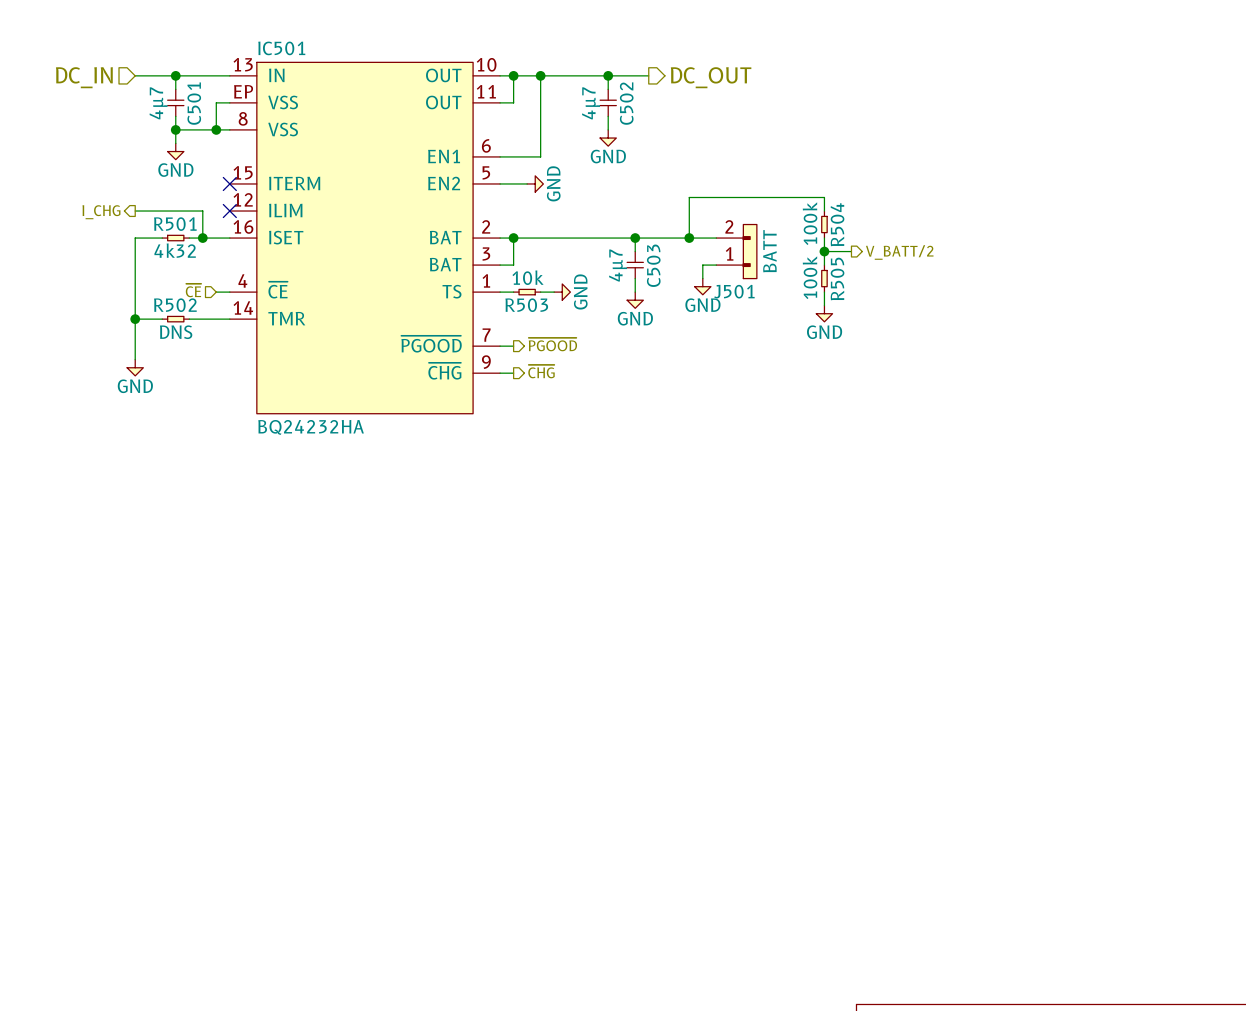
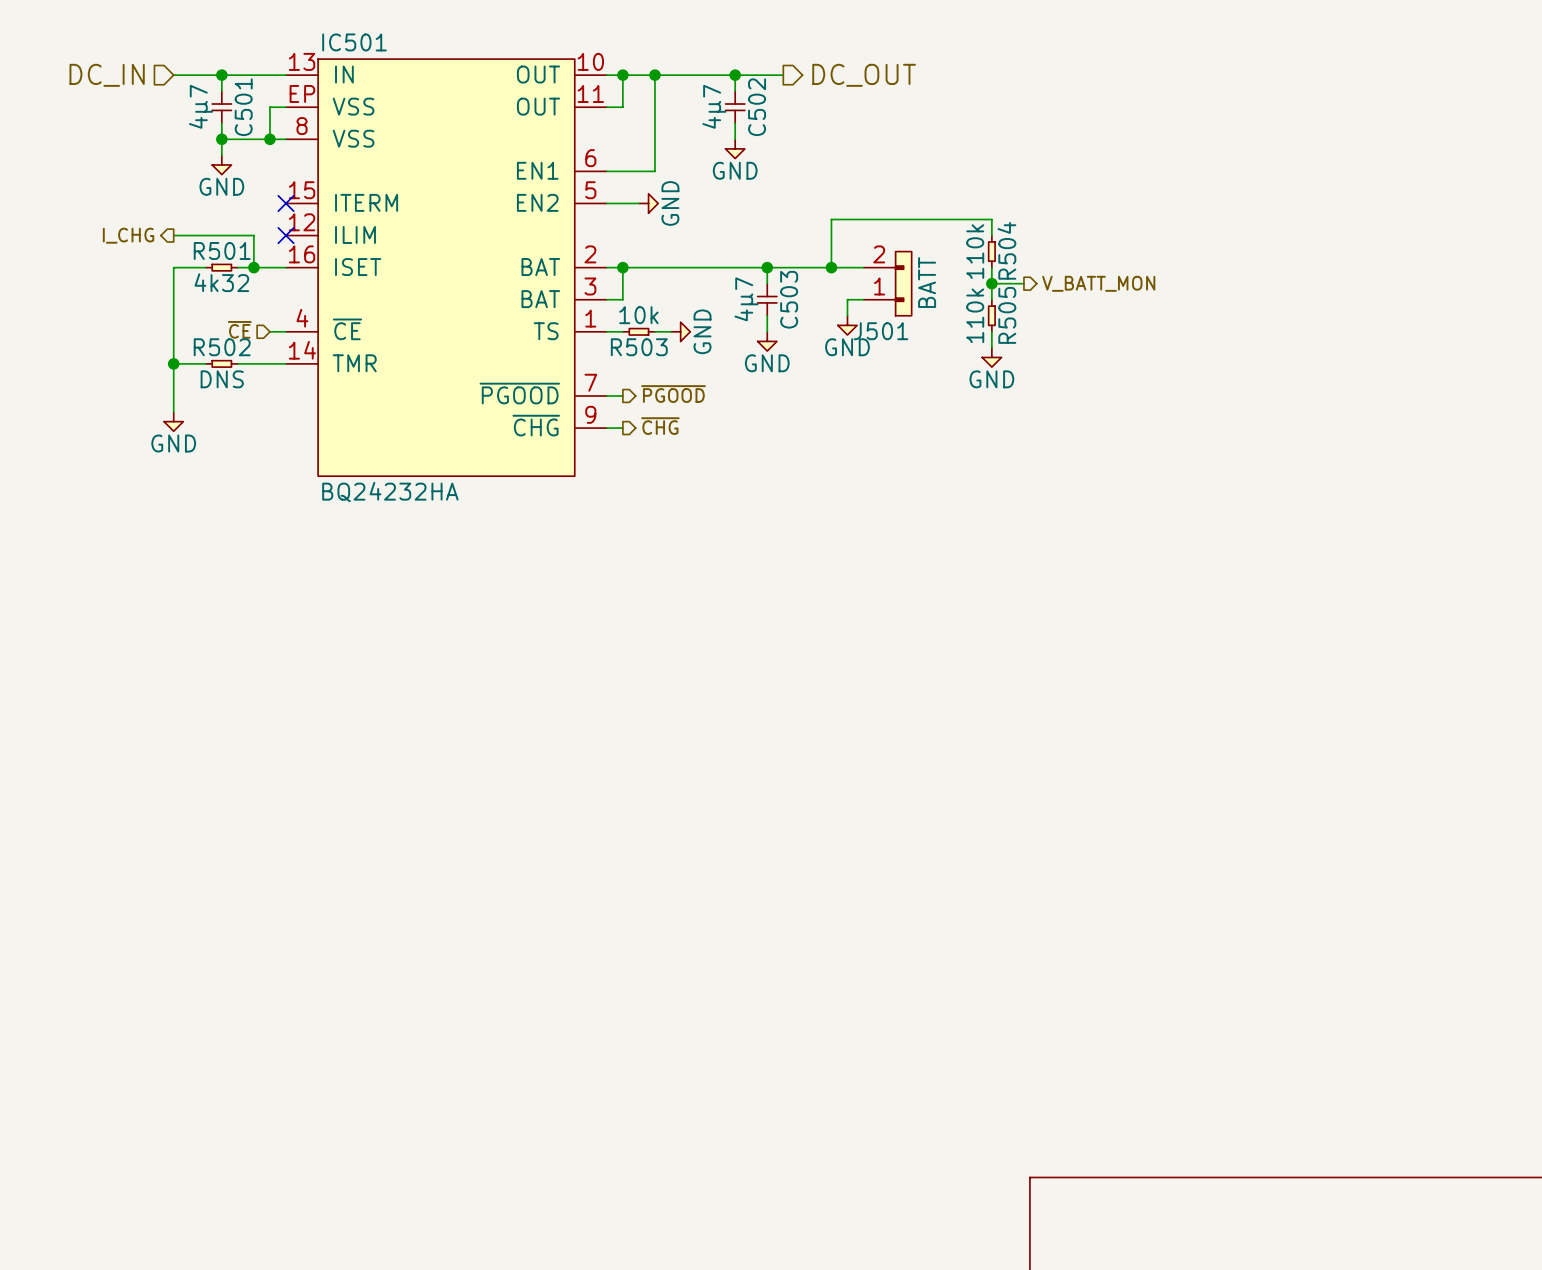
R504 value: 100k (810, 223) -> 110k (975, 251)
hierarchical label: V_BATT/2 (899, 252) -> V_BATT_MON (1098, 283)
R505 value: 100k (810, 277) -> 110k (975, 315)

